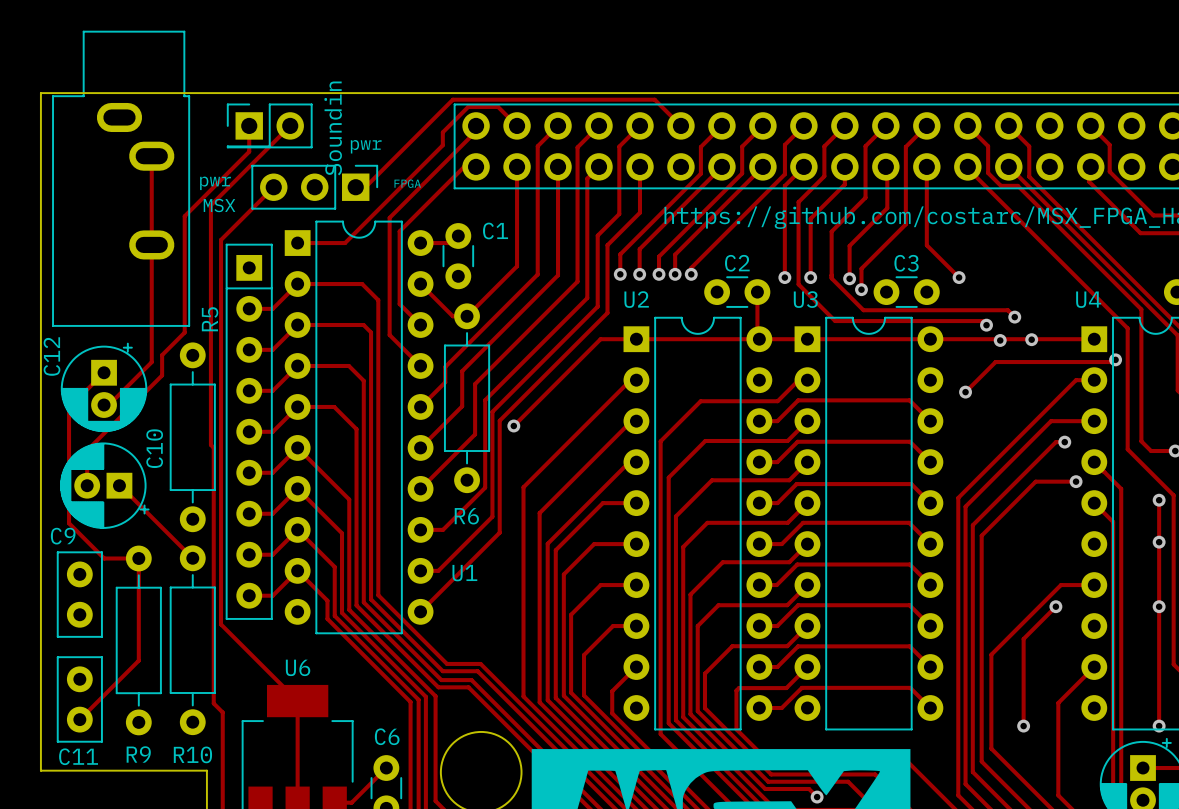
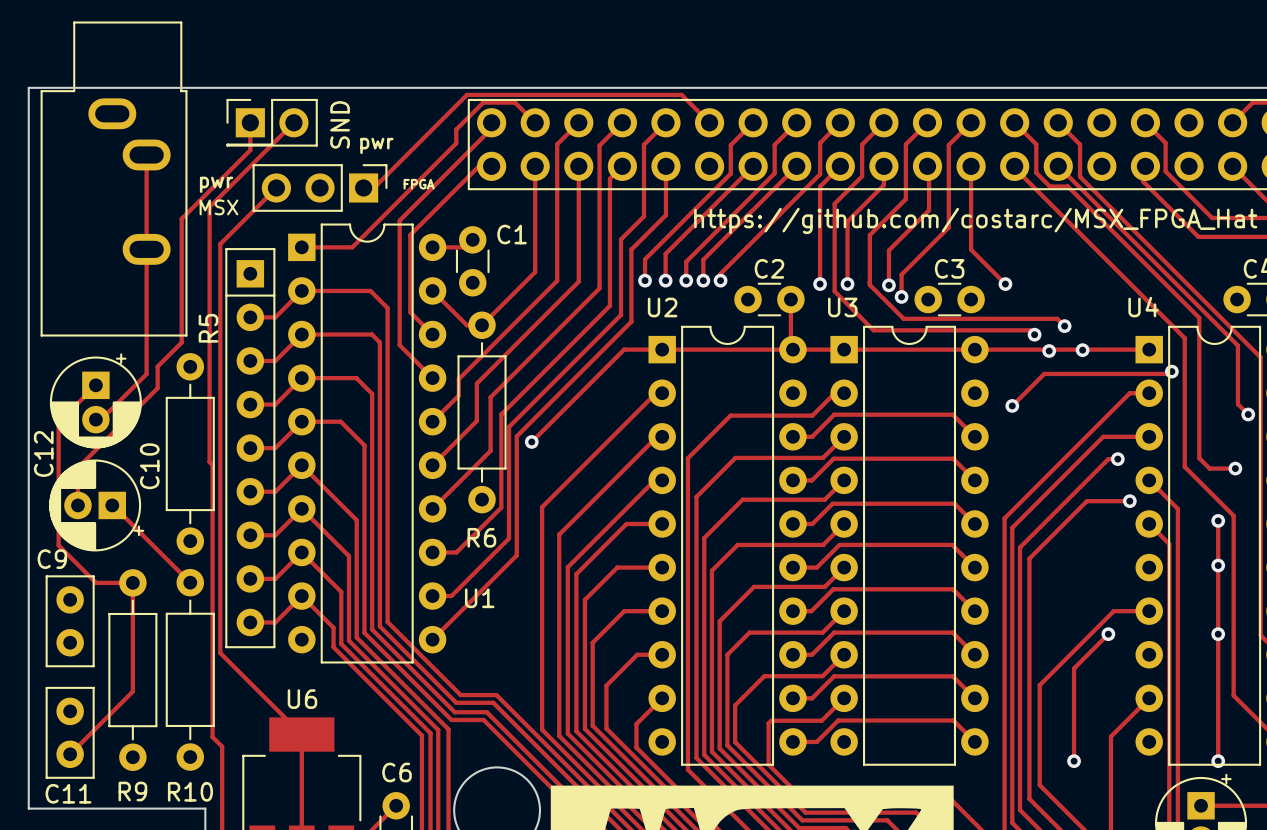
part value: Soundin (333, 128) -> SND (340, 124)
C12 name position: C12 (52, 356) -> C12 (43, 453)

